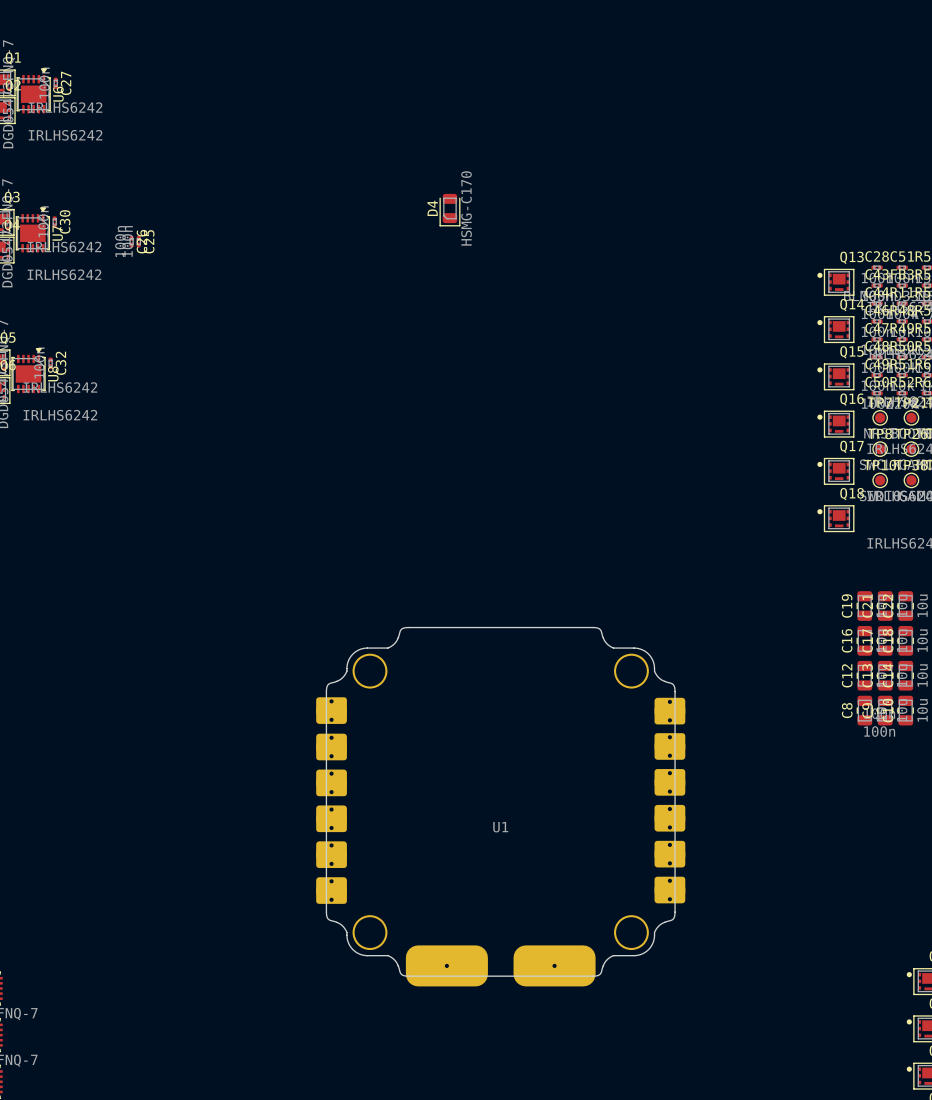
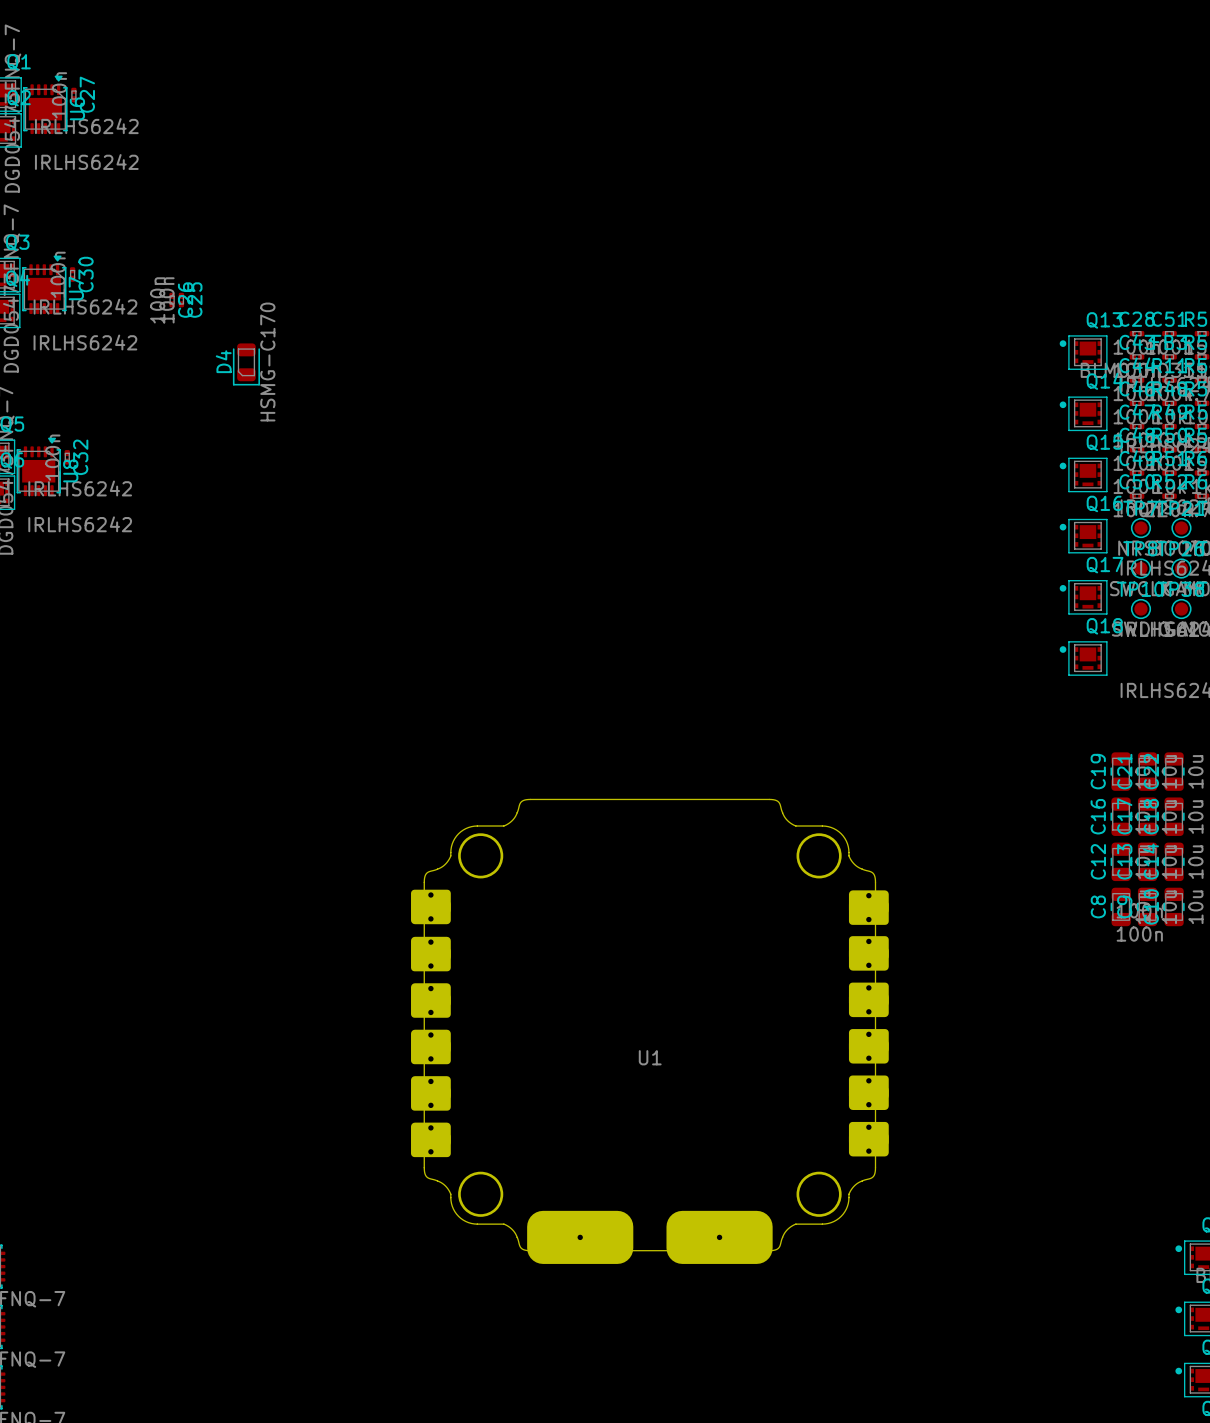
D4 position: (449, 210) -> (246, 364)

